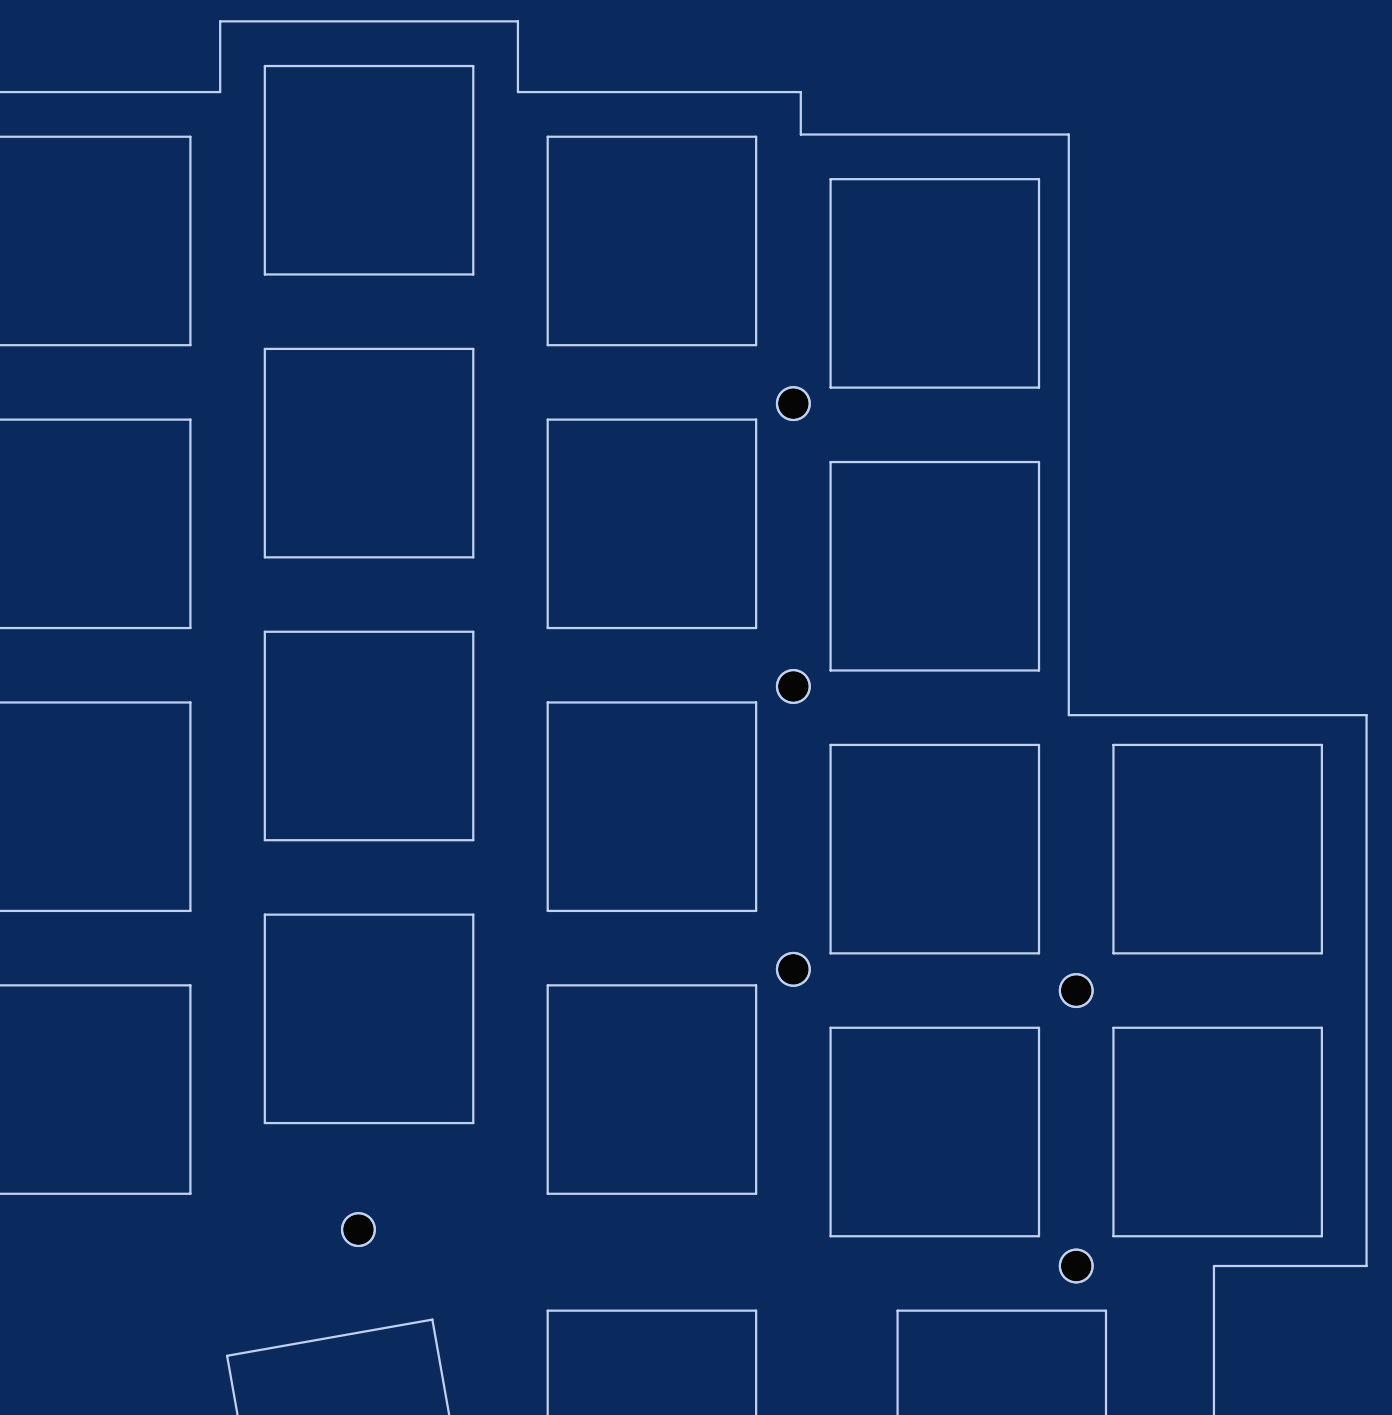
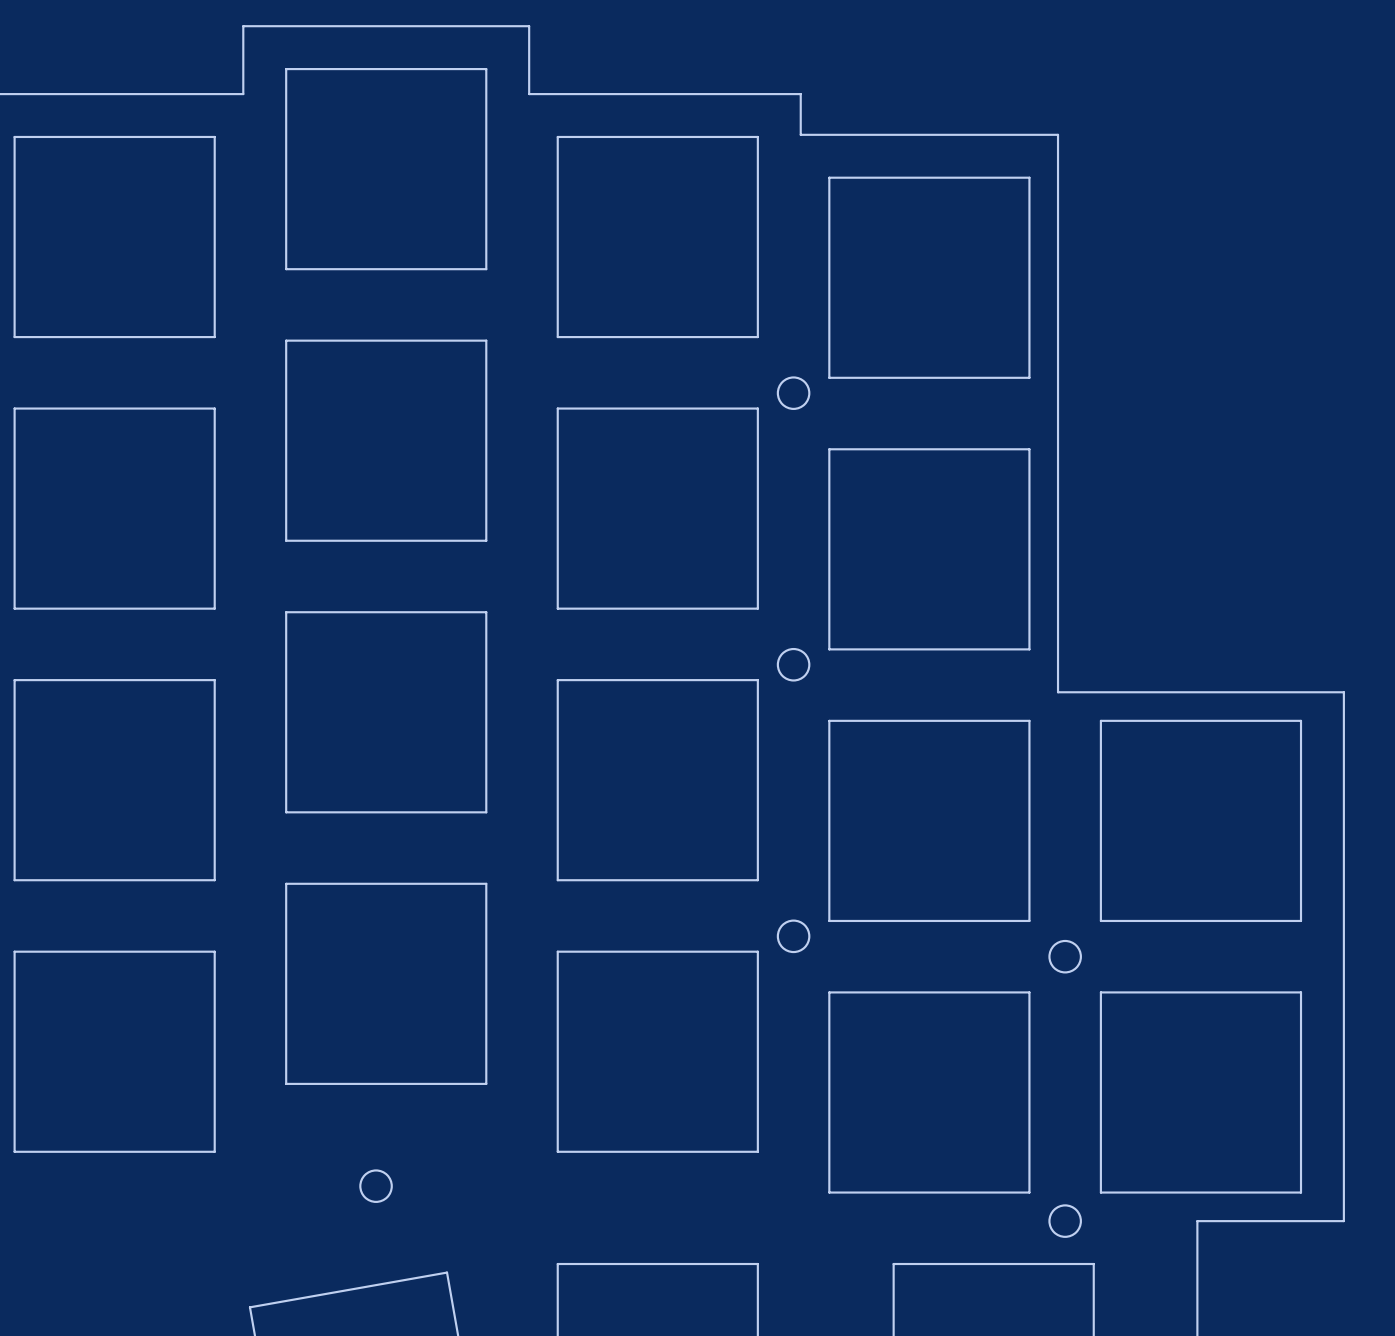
part: (793, 403) -> none
part: (793, 686) -> none
part: (793, 969) -> none
part: (1076, 990) -> none
part: (358, 1229) -> none
part: (1076, 1265) -> none

